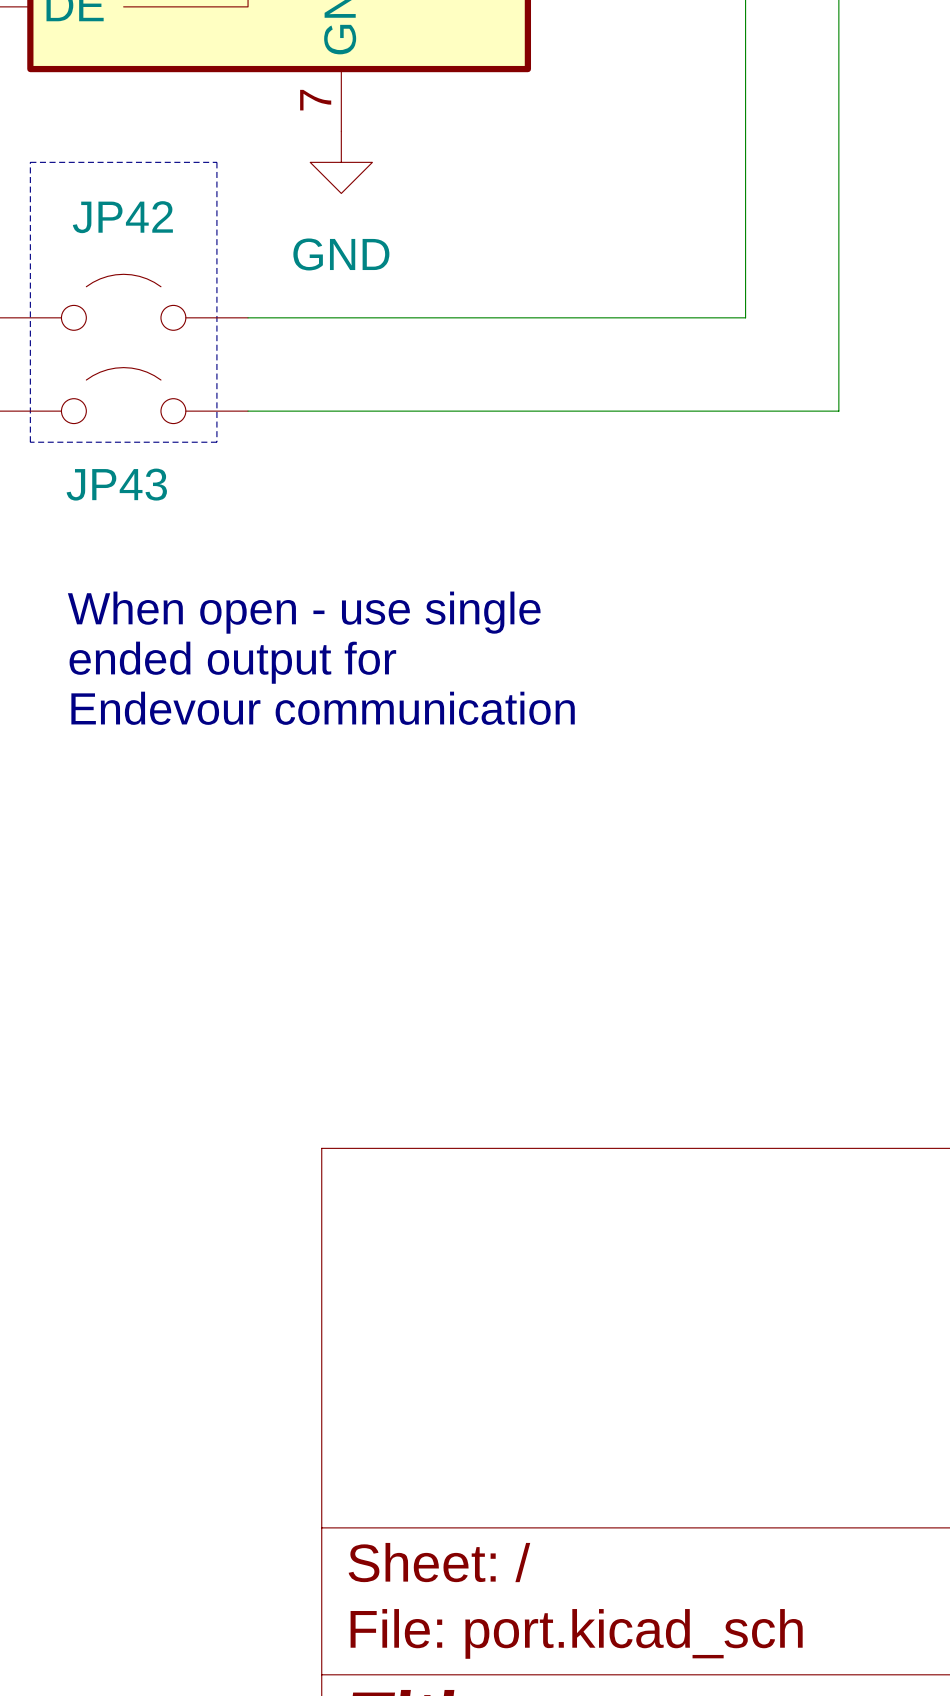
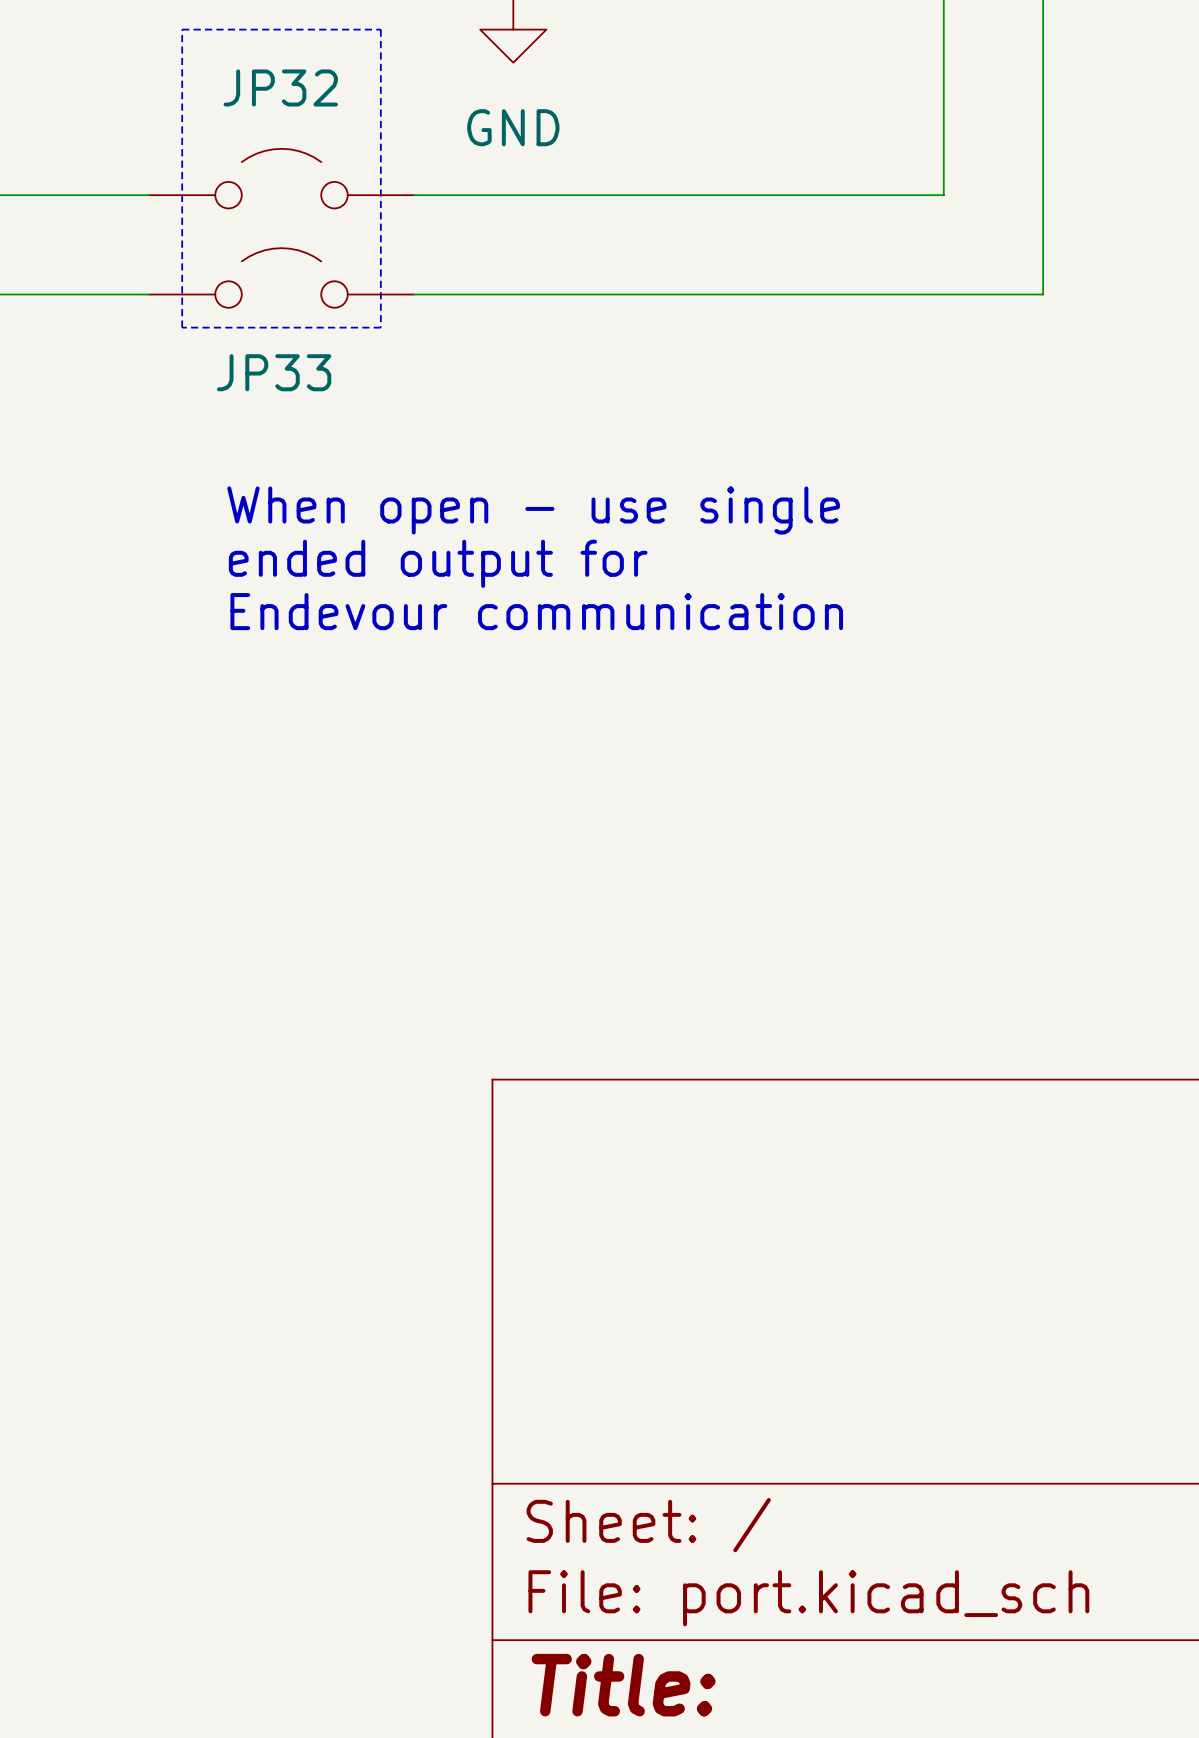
JP42 name: JP42 (122, 217) -> JP32 (280, 87)
JP43 name: JP43 (116, 484) -> JP33 (274, 372)

